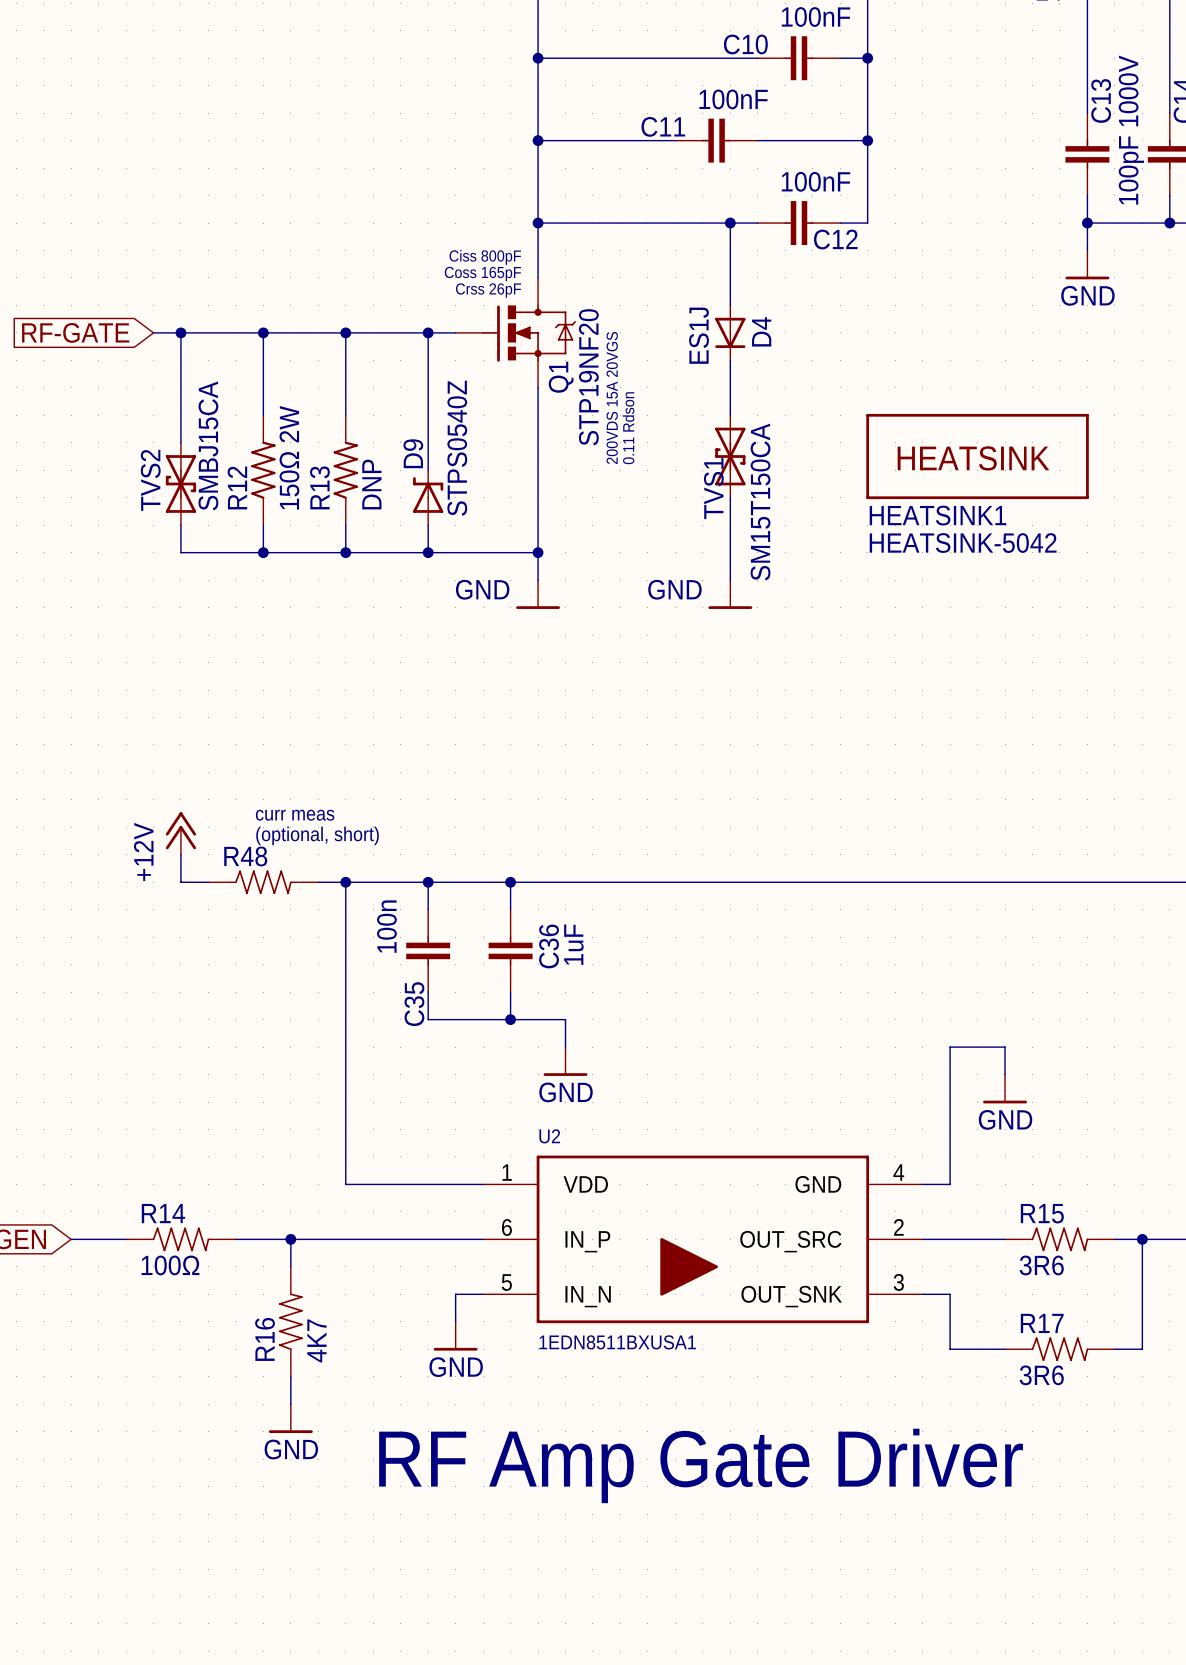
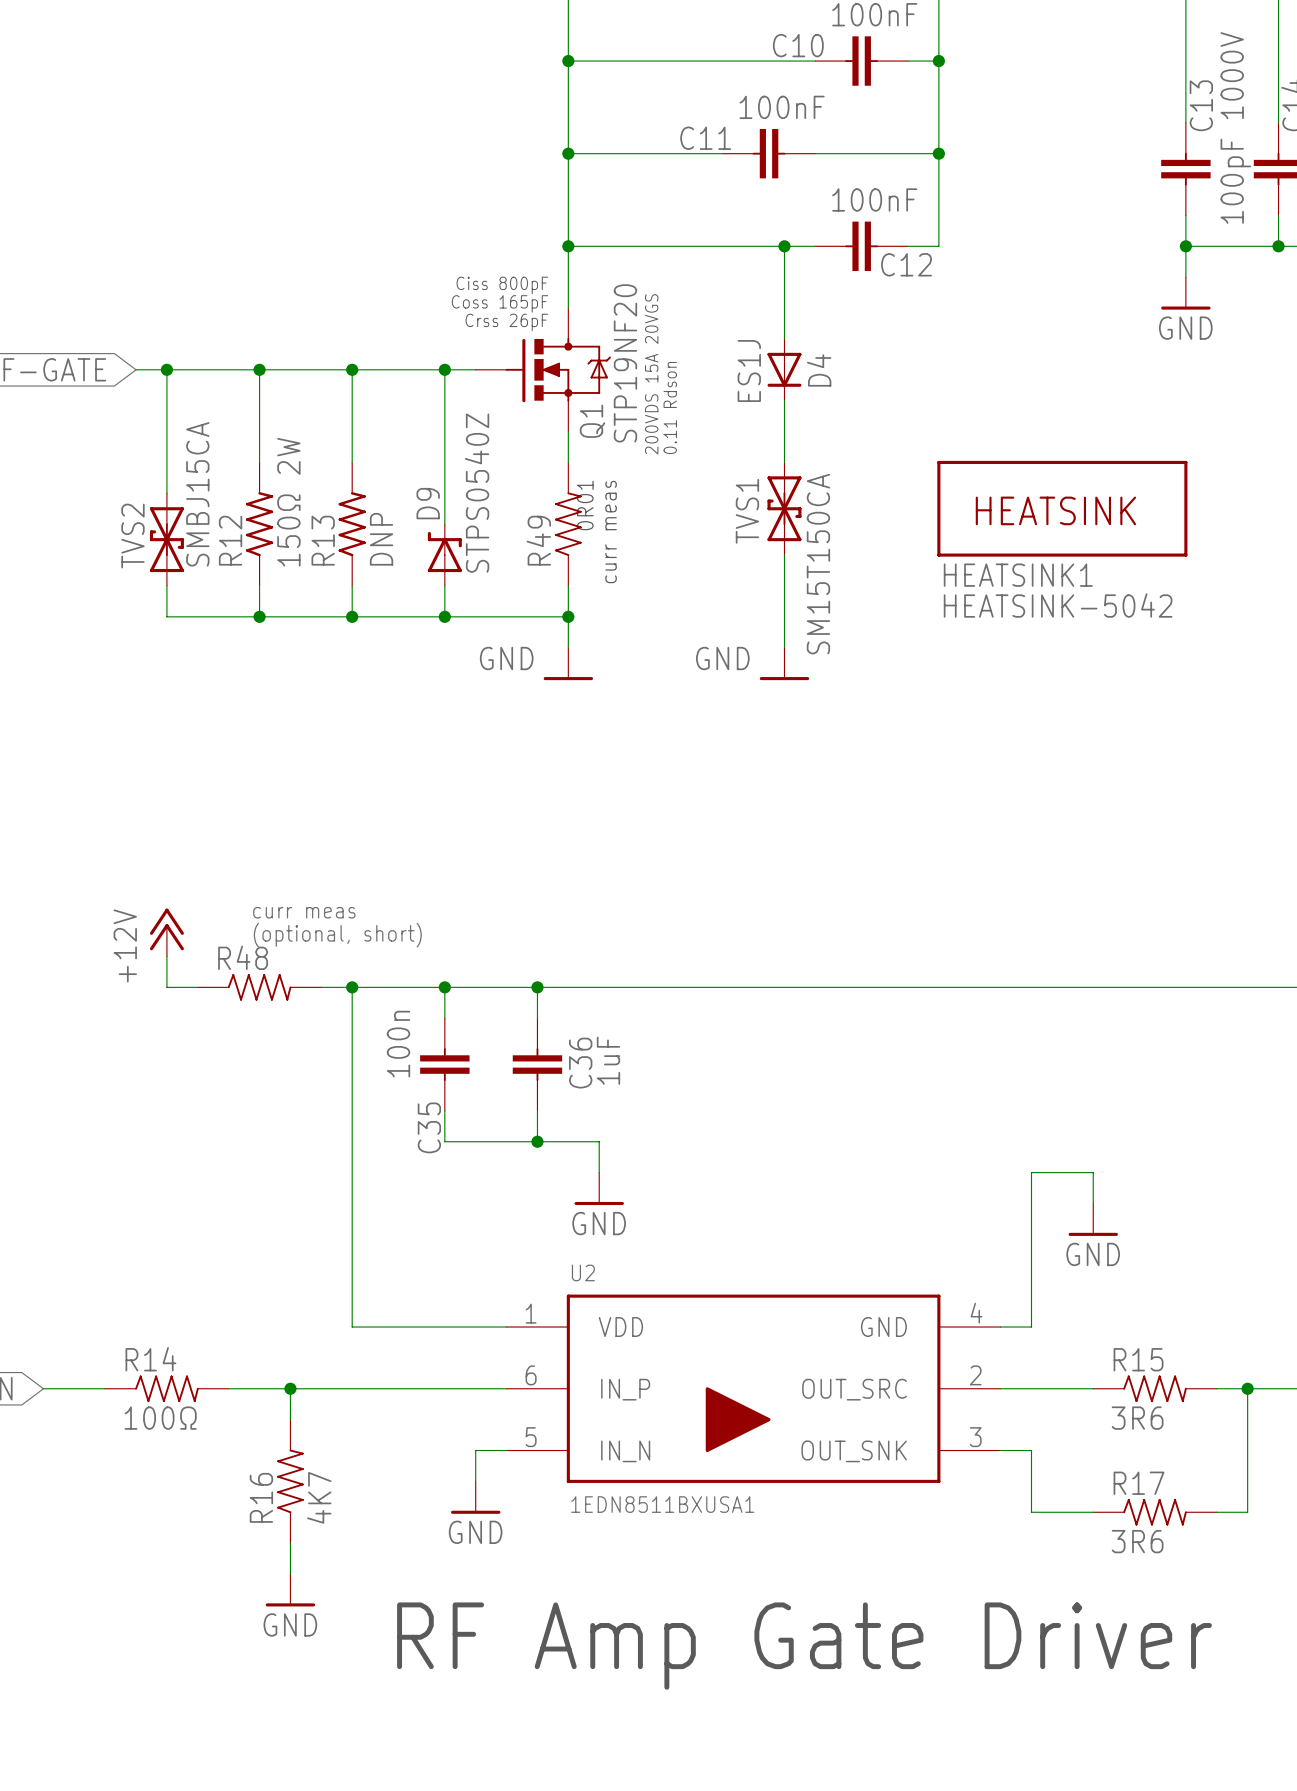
Q1 value position: STP19NF20 (588, 377) -> STP19NF20 (625, 363)
text position: 200VDS 15A 20VGS (612, 398) -> 200VDS 15A 20VGS (651, 374)
text position: 0.11 Rdson (628, 428) -> 0.11 Rdson (670, 407)
text: none -> 0R01 (585, 505)
text: none -> curr meas (611, 531)
R49: none -> (568, 524)
TVS1 name position: TVS1 (713, 488) -> TVS1 (747, 511)

